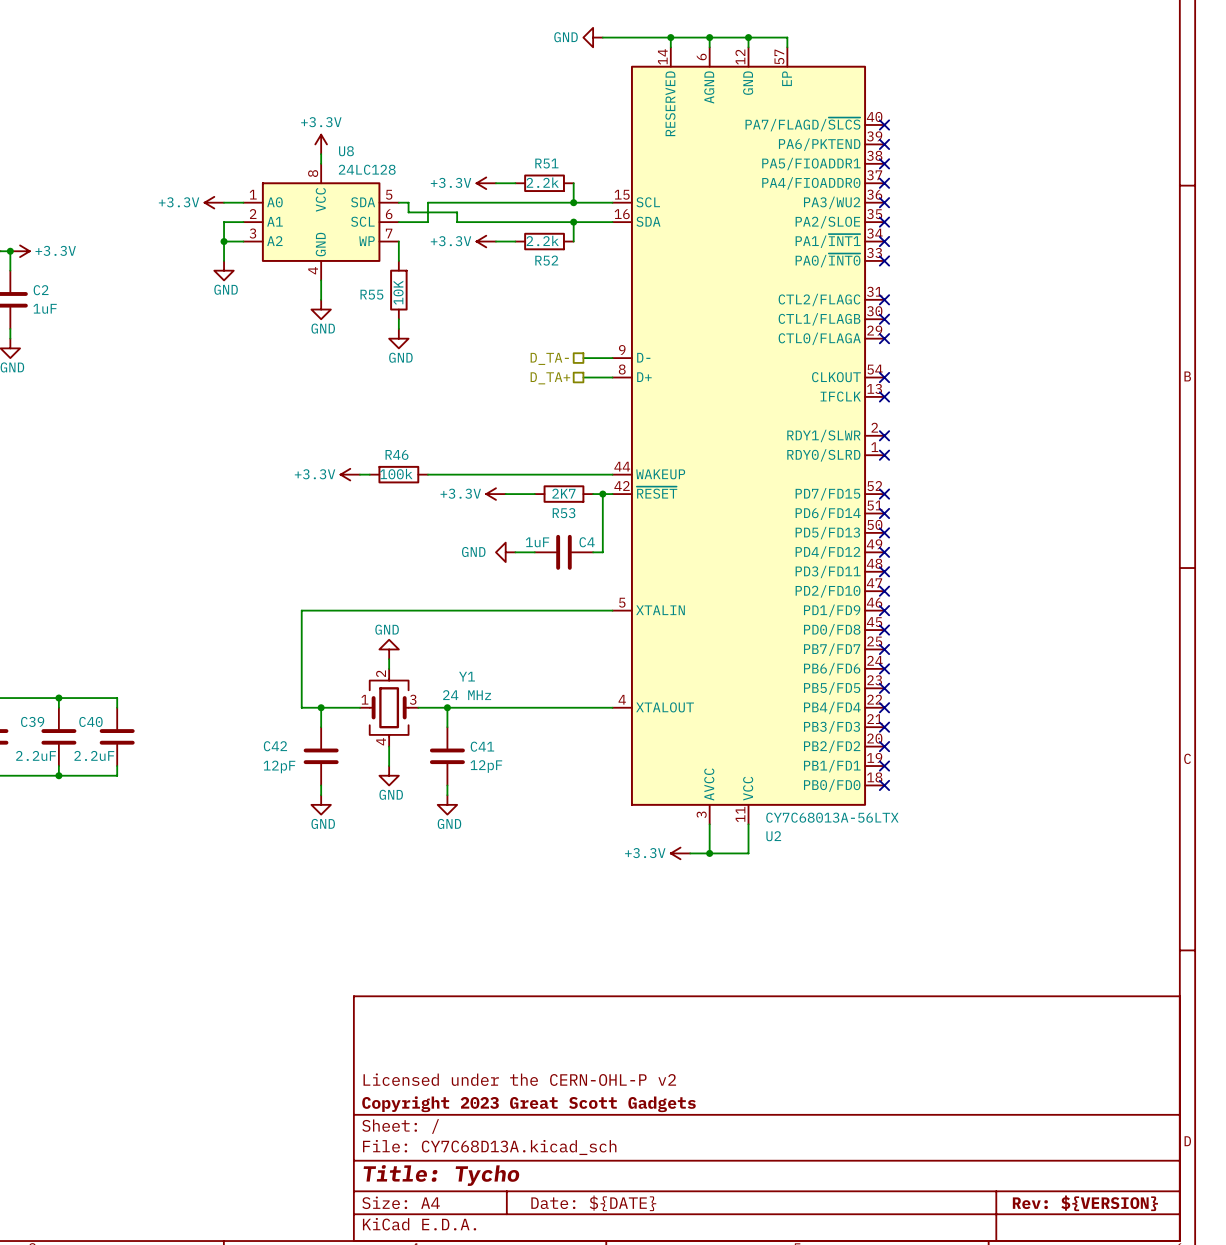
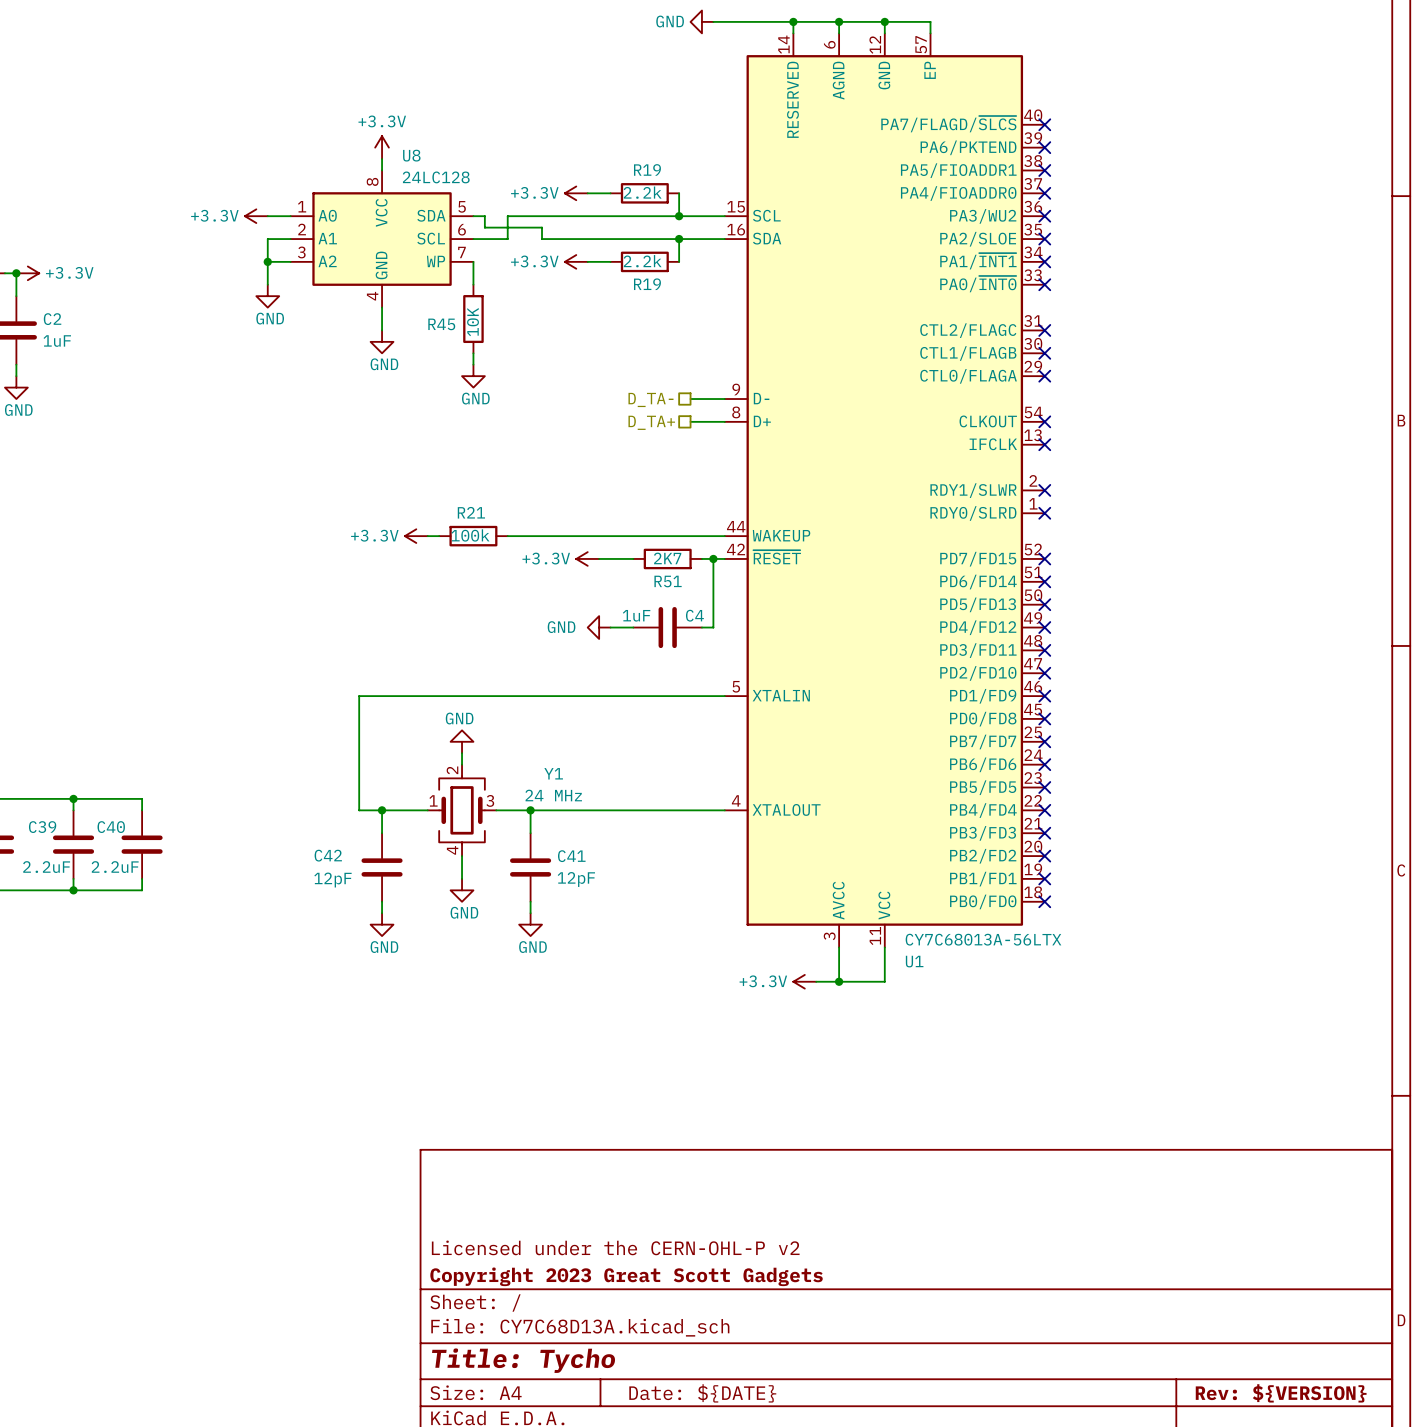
R51 name: R51 (546, 163) -> R19 (647, 169)
R52 name: R52 (546, 260) -> R19 (647, 284)
R55 name: R55 (371, 294) -> R45 (441, 324)
R46 name: R46 (396, 454) -> R21 (471, 512)
R53 name: R53 (564, 513) -> R51 (668, 581)
U2 name: U2 (773, 836) -> U1 (914, 961)

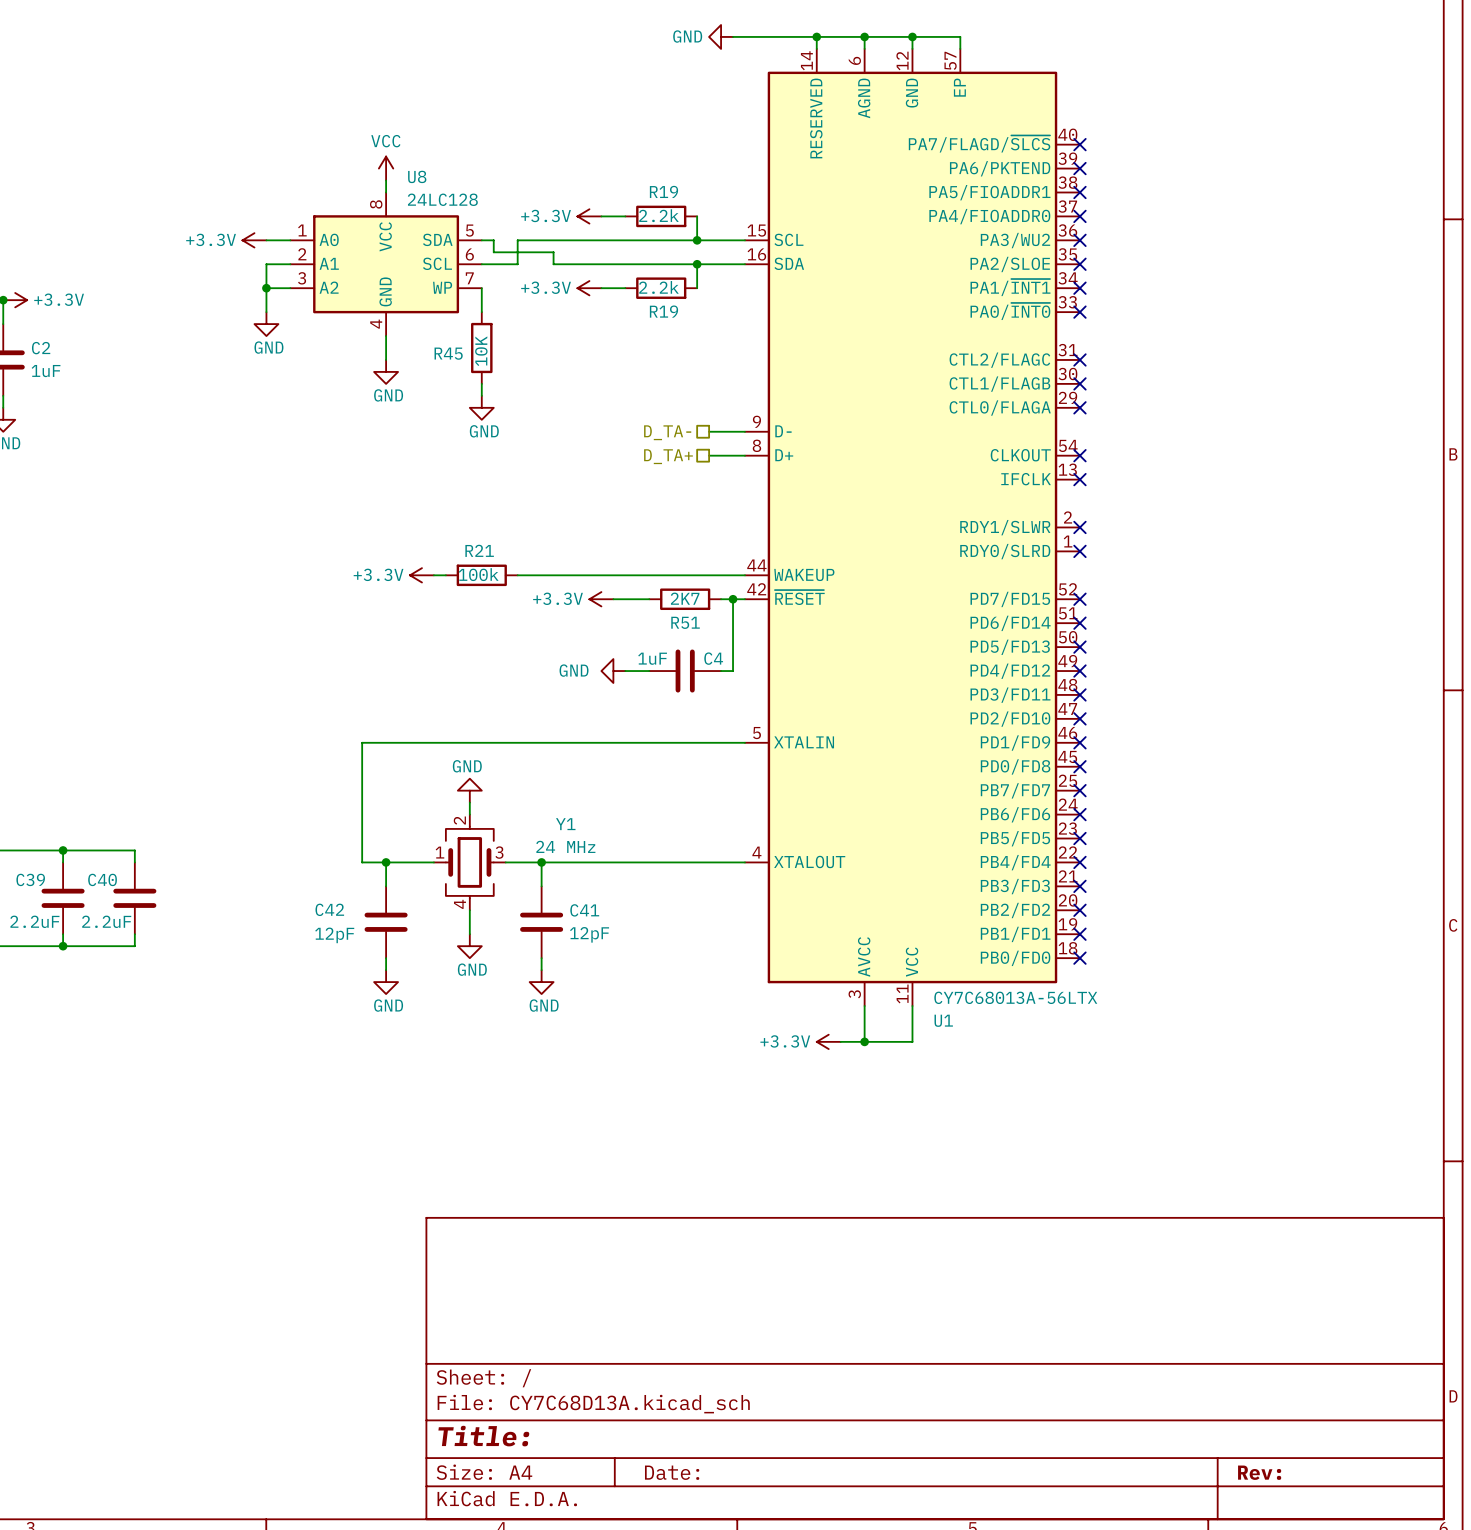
power symbol: +3.3V (382, 147) -> VCC (386, 168)
title block: Licensed under the CERN-OHL-P v2 (615, 1247) -> none
title block: Copyright 2023 Great Scott Gadgets (626, 1276) -> none
title block: Title: Tycho (523, 1360) -> Title: (483, 1436)
title block: Date: ${DATE} (702, 1393) -> Date: (672, 1472)
title block: Rev: ${VERSION} (1281, 1393) -> Rev: (1259, 1472)

